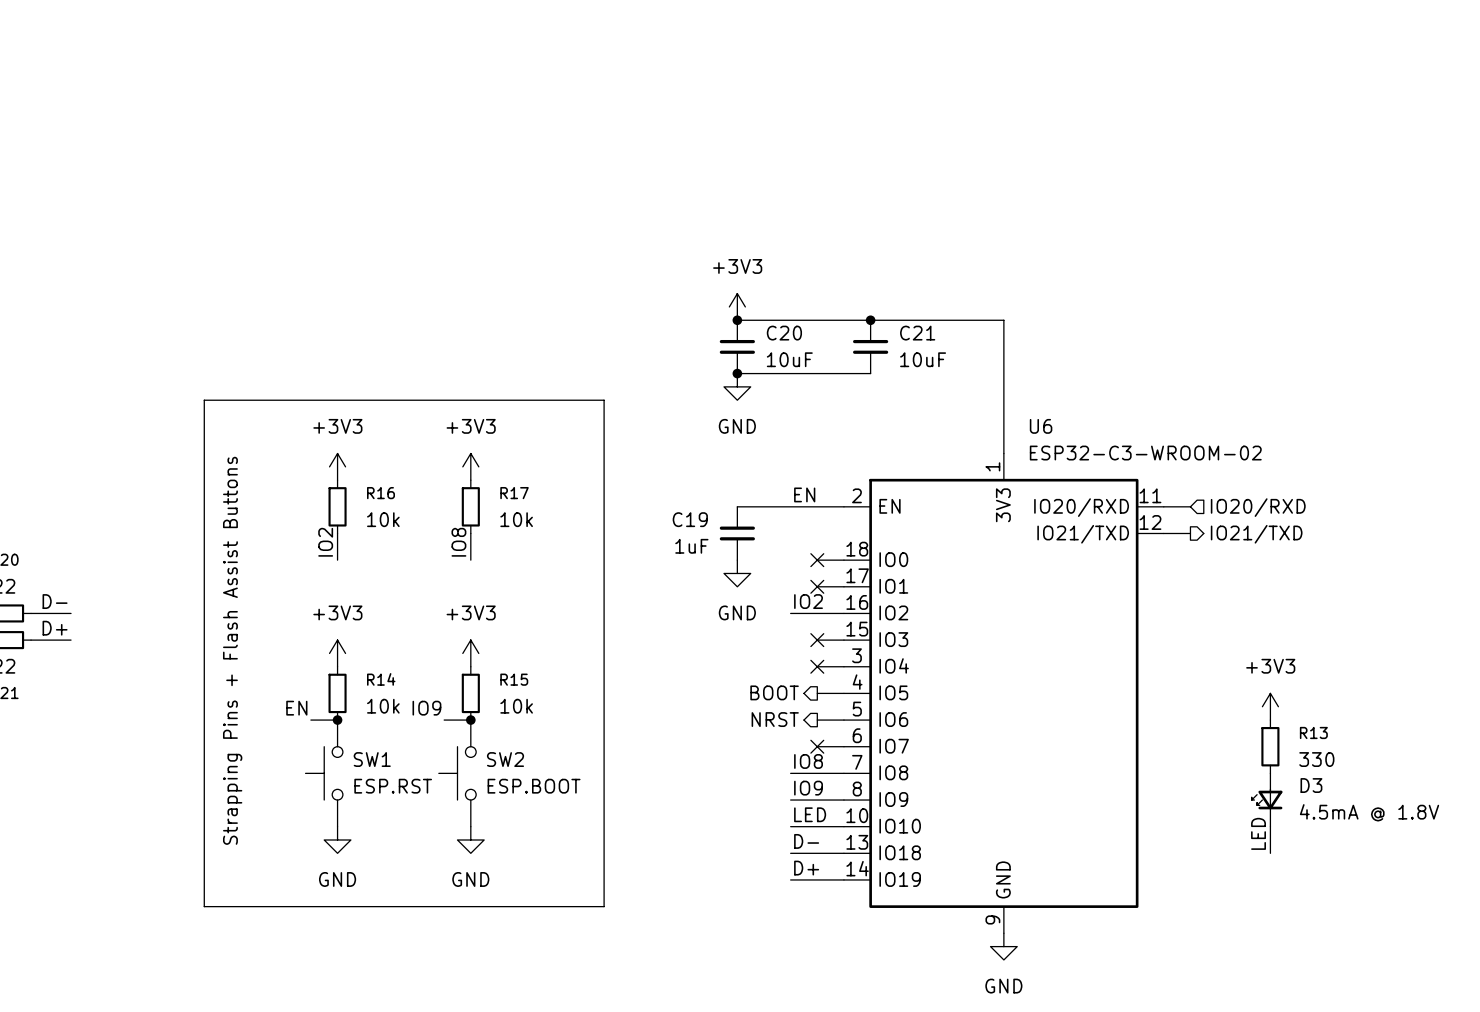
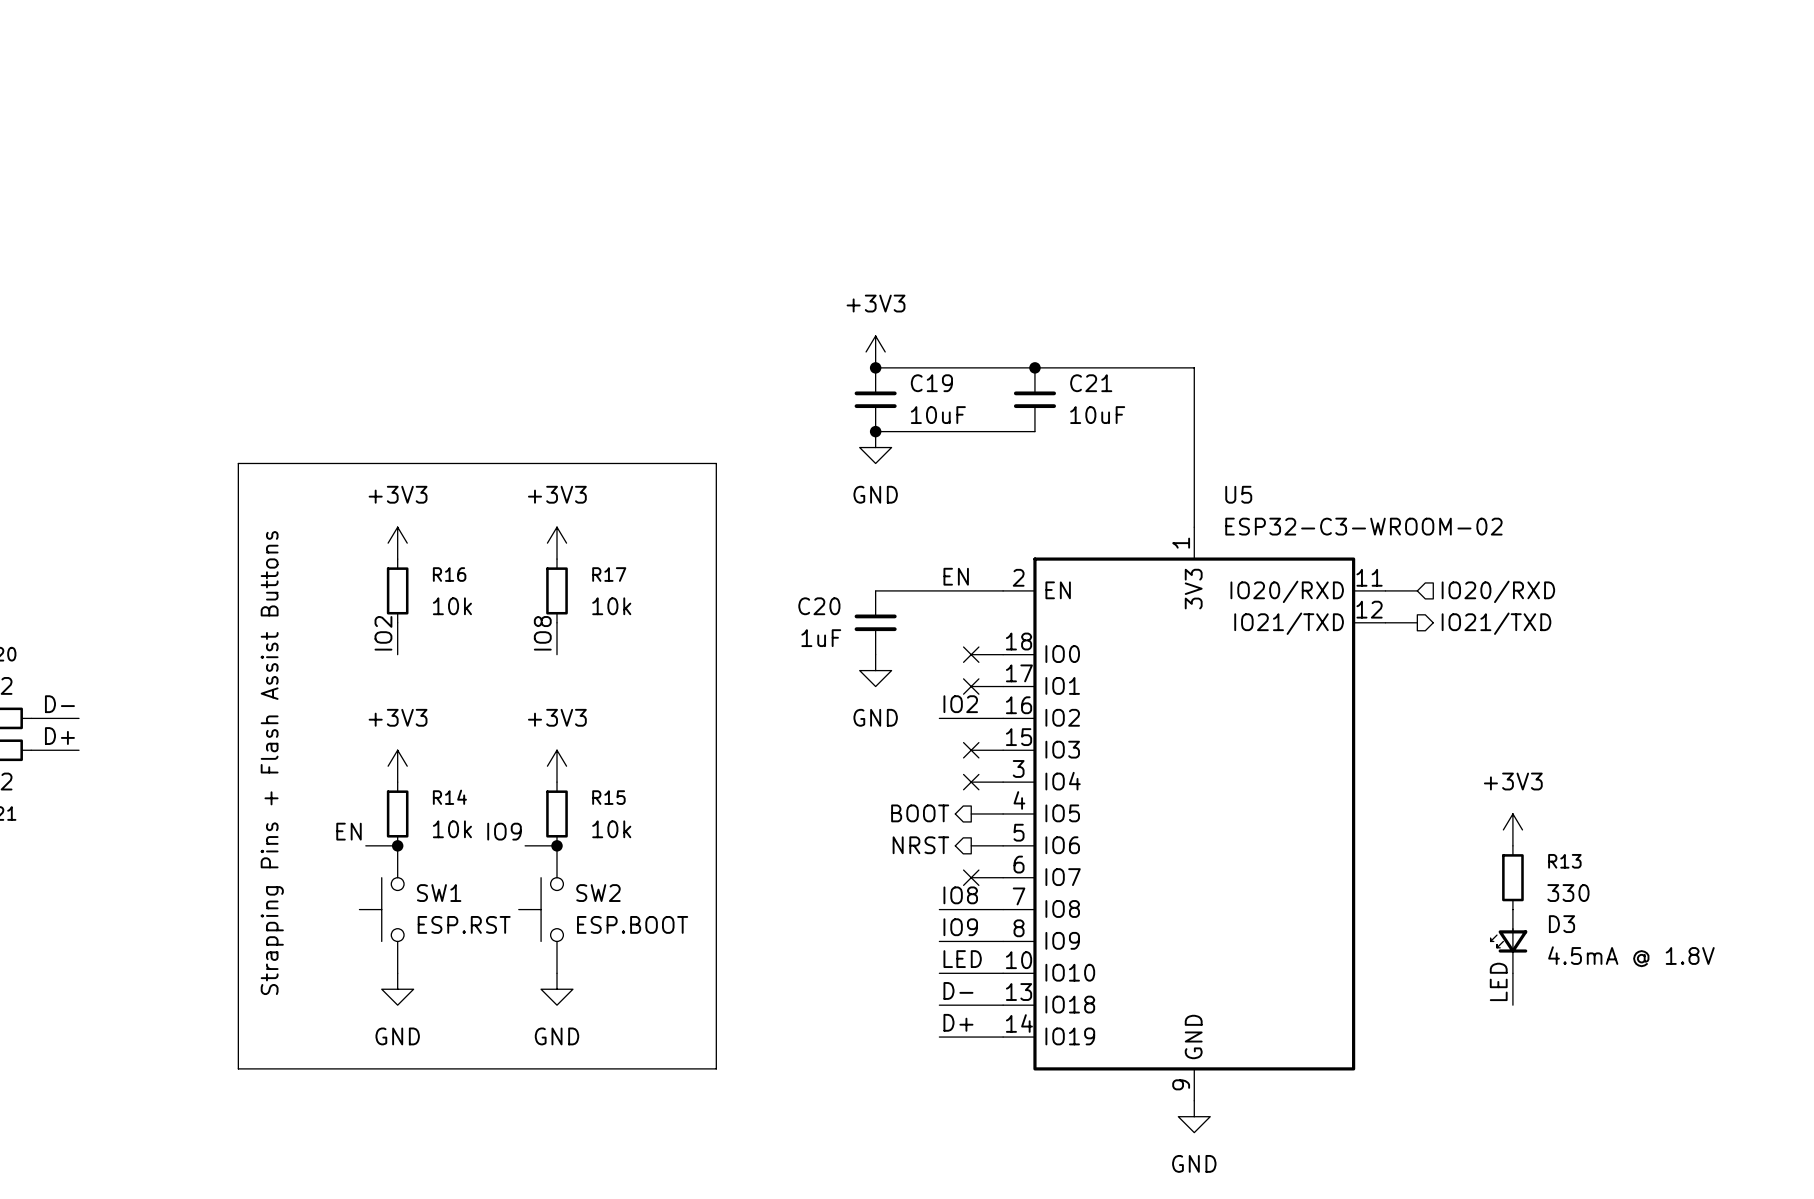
C20 name: C20 (784, 333) -> C19 (931, 383)
U6 name: U6 (1041, 426) -> U5 (1238, 494)
C19 name: C19 (690, 519) -> C20 (819, 606)

